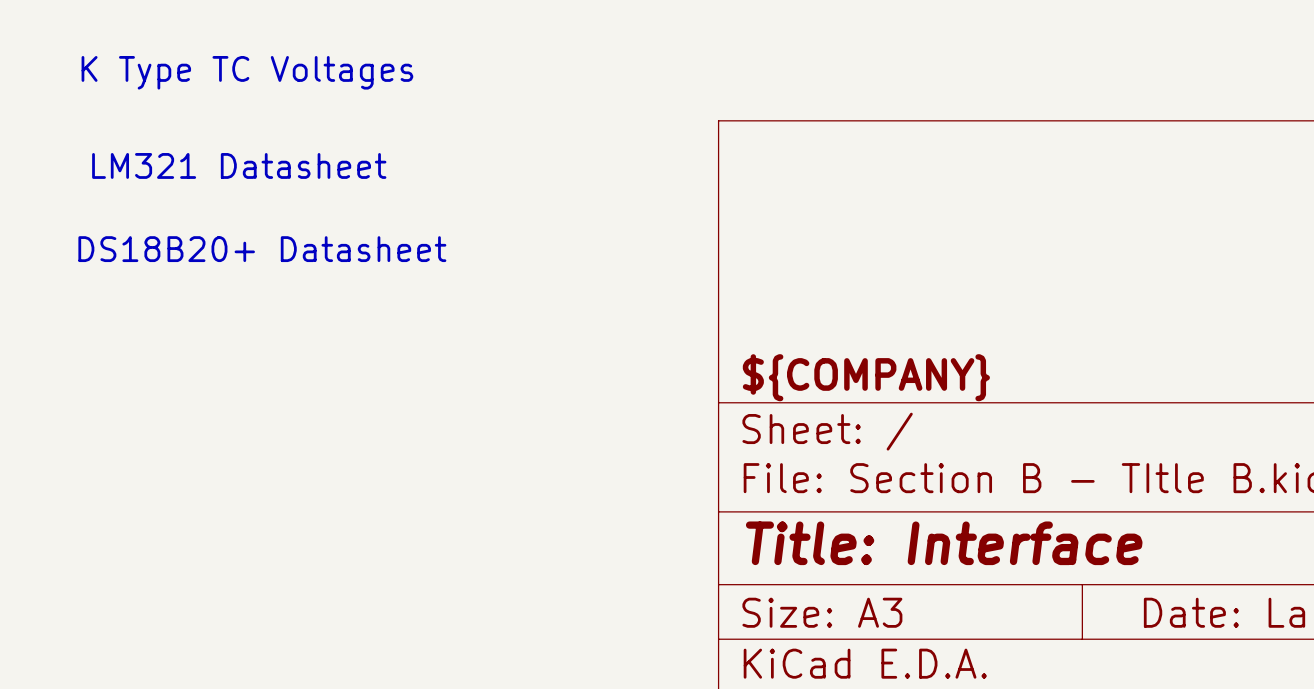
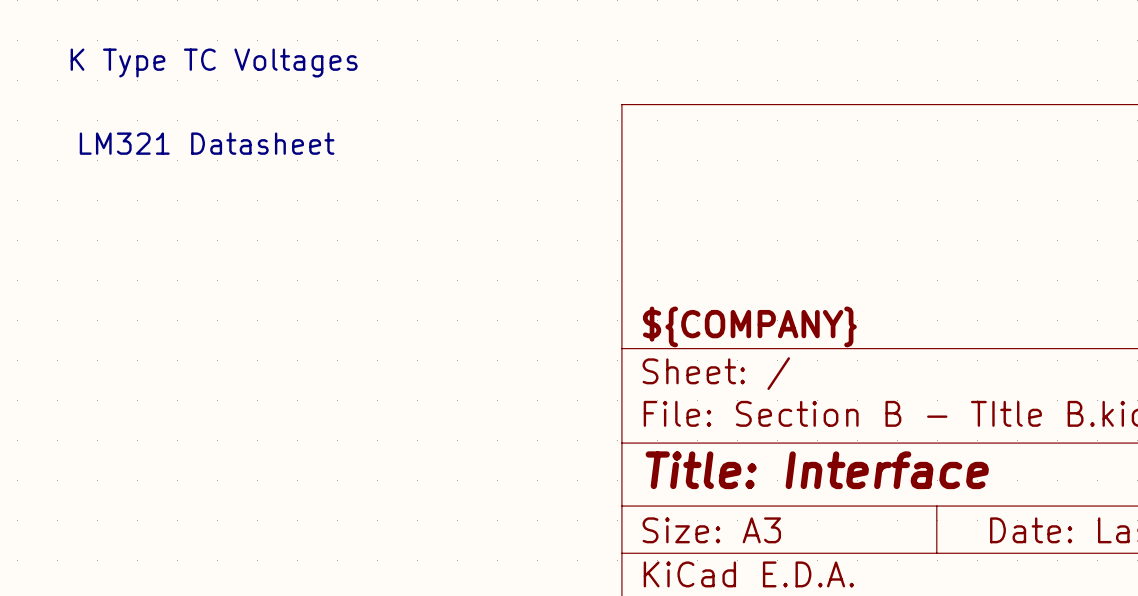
text: DS18B20+ Datasheet (262, 249) -> none

